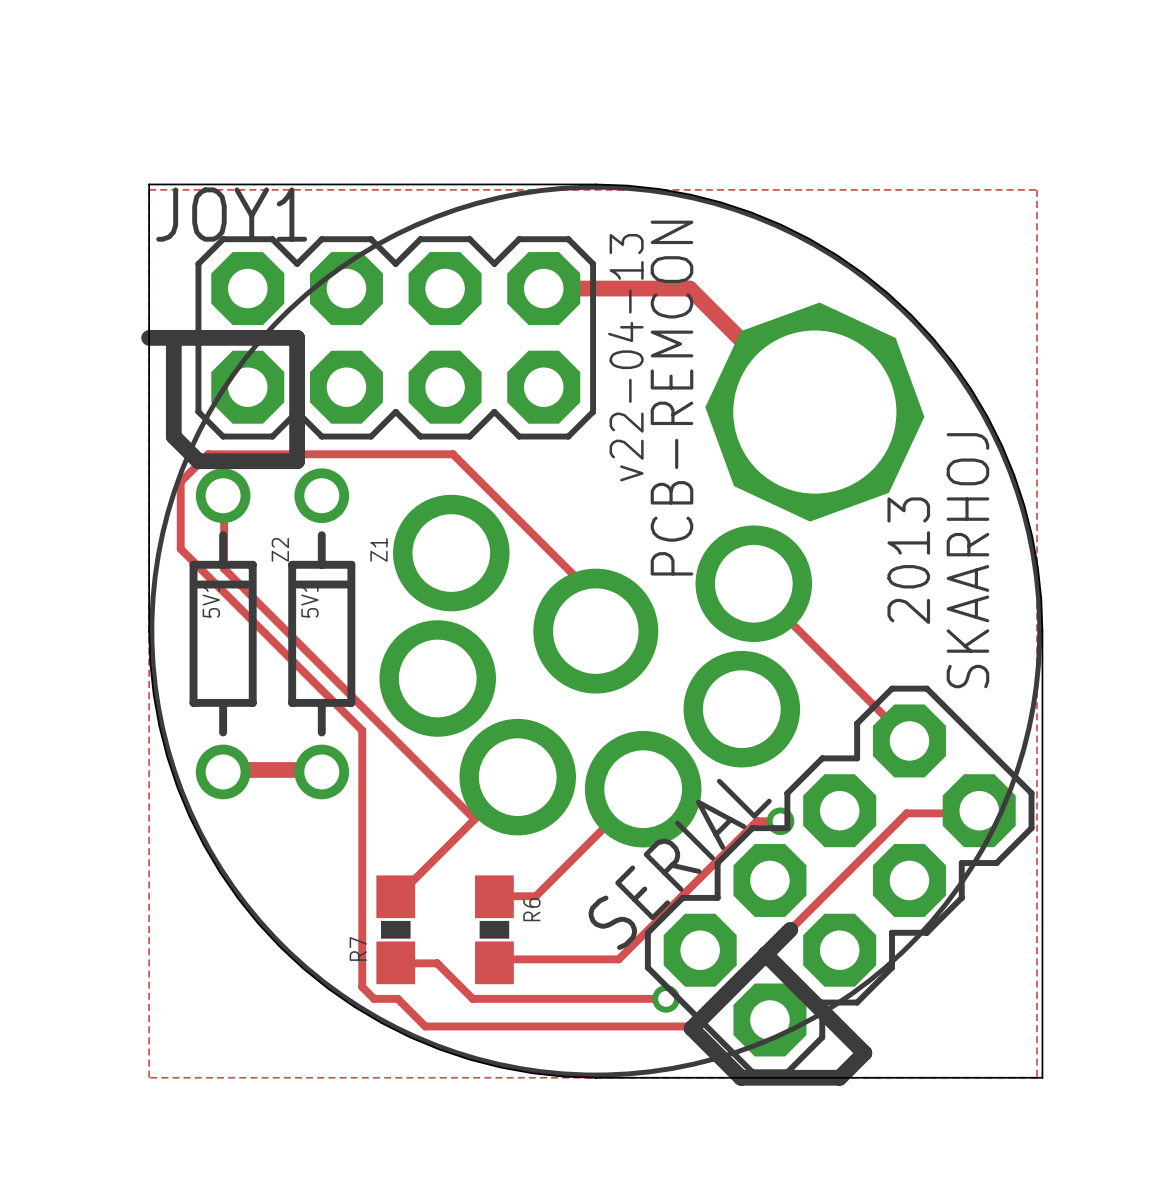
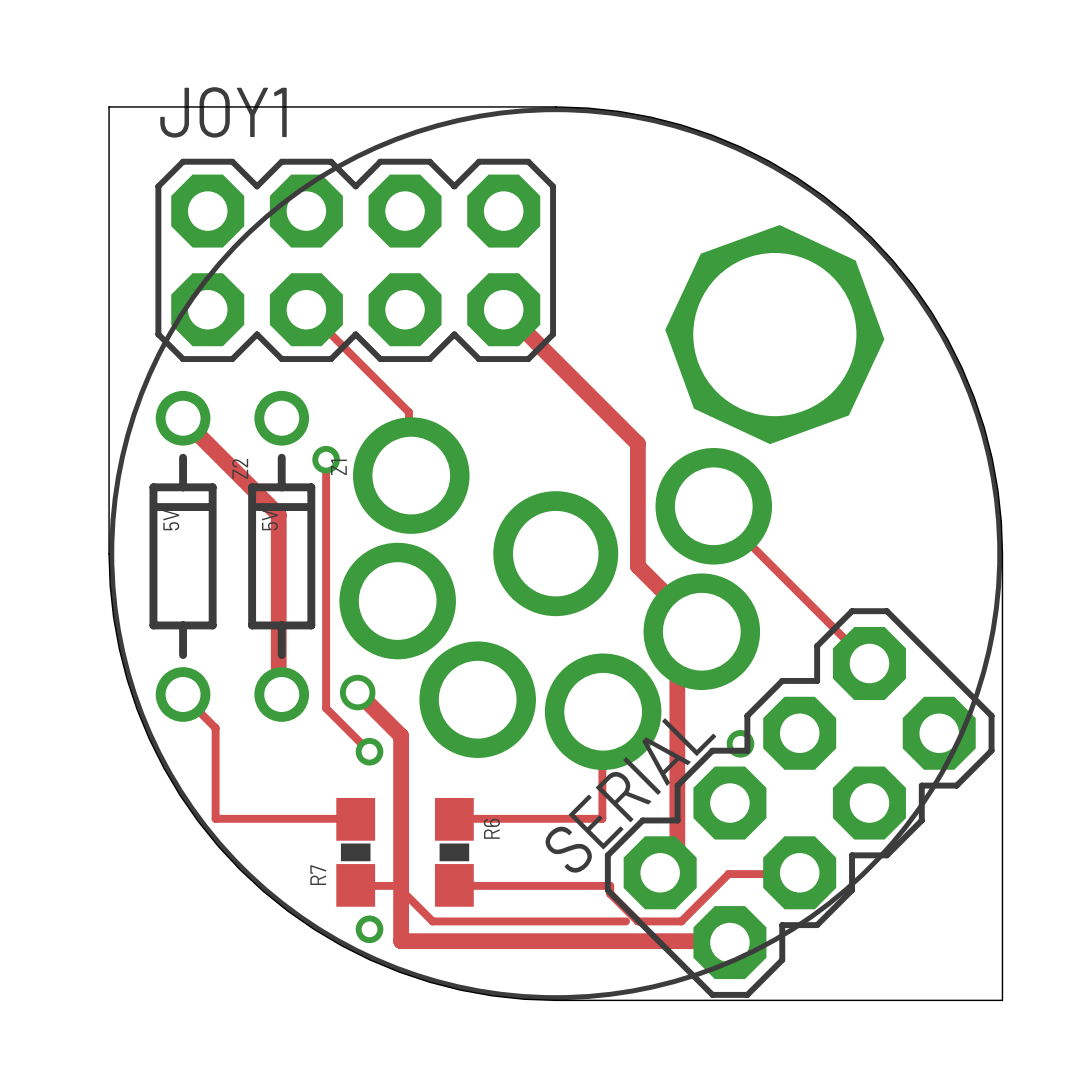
zone outline: (149, 189) (1037, 189) (1037, 1077) (149, 1077) (149, 189) -> none
JOY1 name position: JOY1 (231, 214) -> JOY1 (223, 112)
track: (543, 288) (689, 288) (814, 412) -> none
line: (149, 337) (297, 337) (297, 461) (198, 461) (173, 436) (173, 337) -> none
text: v22-04-13 (625, 357) -> none
track: none -> (306, 309) (408, 412) (408, 475) (411, 475)
track: none -> (503, 309) (637, 443) (637, 566) (701, 631) (677, 657) (677, 854) (660, 872)
text: PCB-REMCON (671, 398) -> none
track: none -> (183, 418) (278, 514) (278, 692)
track: (224, 497) (224, 568) (474, 819) -> none
track: none -> (326, 459) (326, 708) (369, 751)
via: none -> (326, 459)
text: 2013 (908, 560) -> none
text: SKAARHOJ (967, 560) -> none
track: (595, 631) (595, 596) (452, 454) (208, 454) (180, 481) (180, 548) (362, 730) (362, 987) (374, 998) (397, 998) (425, 1026) (693, 1026) (721, 998) -> none
track: (318, 769) (224, 769) (223, 771) -> (355, 819) (215, 818) (215, 728) (183, 694)
track: none -> (357, 692) (401, 735) (401, 941) (729, 942)
via: none -> (357, 692)
track: (517, 777) (395, 896) -> none
track: (642, 789) (535, 896) -> (602, 712) (602, 818) (495, 818)
track: (979, 810) (977, 813) (906, 813) (768, 951) -> (799, 872) (728, 874)
track: (780, 821) (756, 821) (618, 959) (496, 959) (494, 962) -> (681, 921) (637, 921) (610, 893) (610, 885) (454, 885)
via: none -> (369, 751)
line: (790, 929) (691, 1028) (741, 1077) (839, 1077) (864, 1053) (765, 954) -> none
via: (666, 998) -> none
via: none -> (369, 929)

